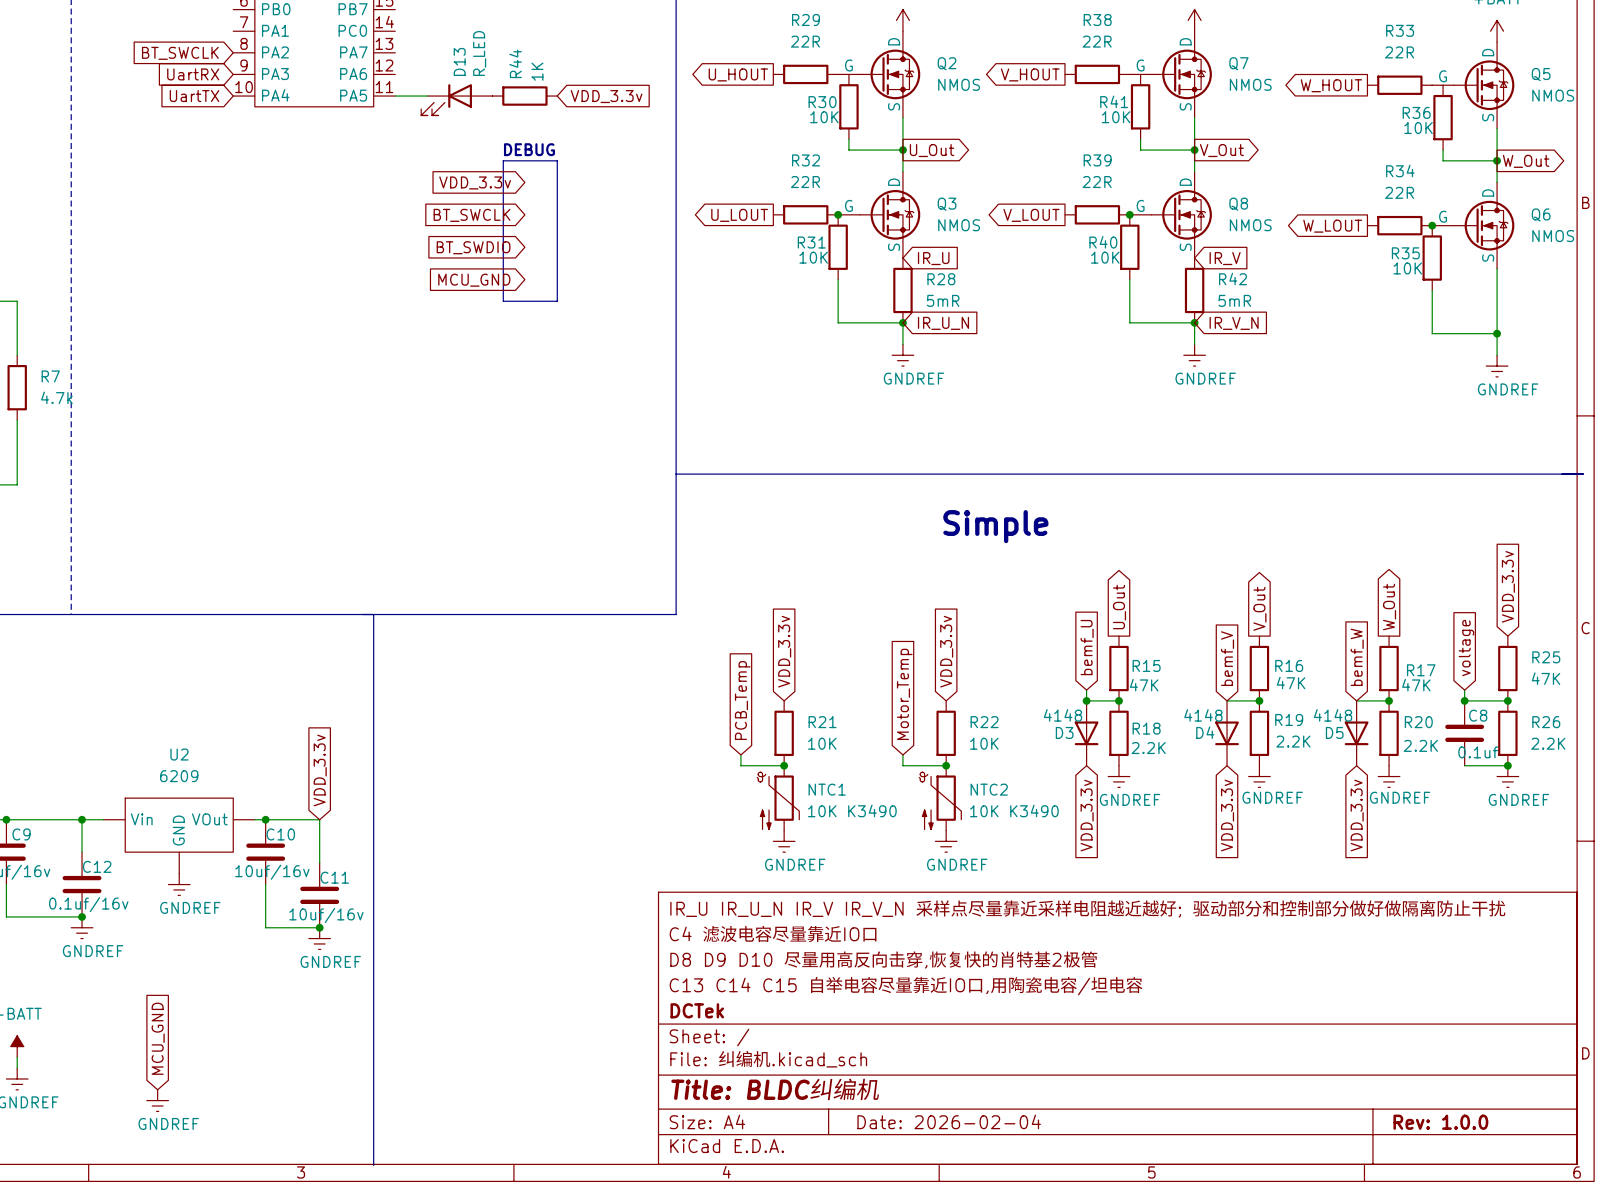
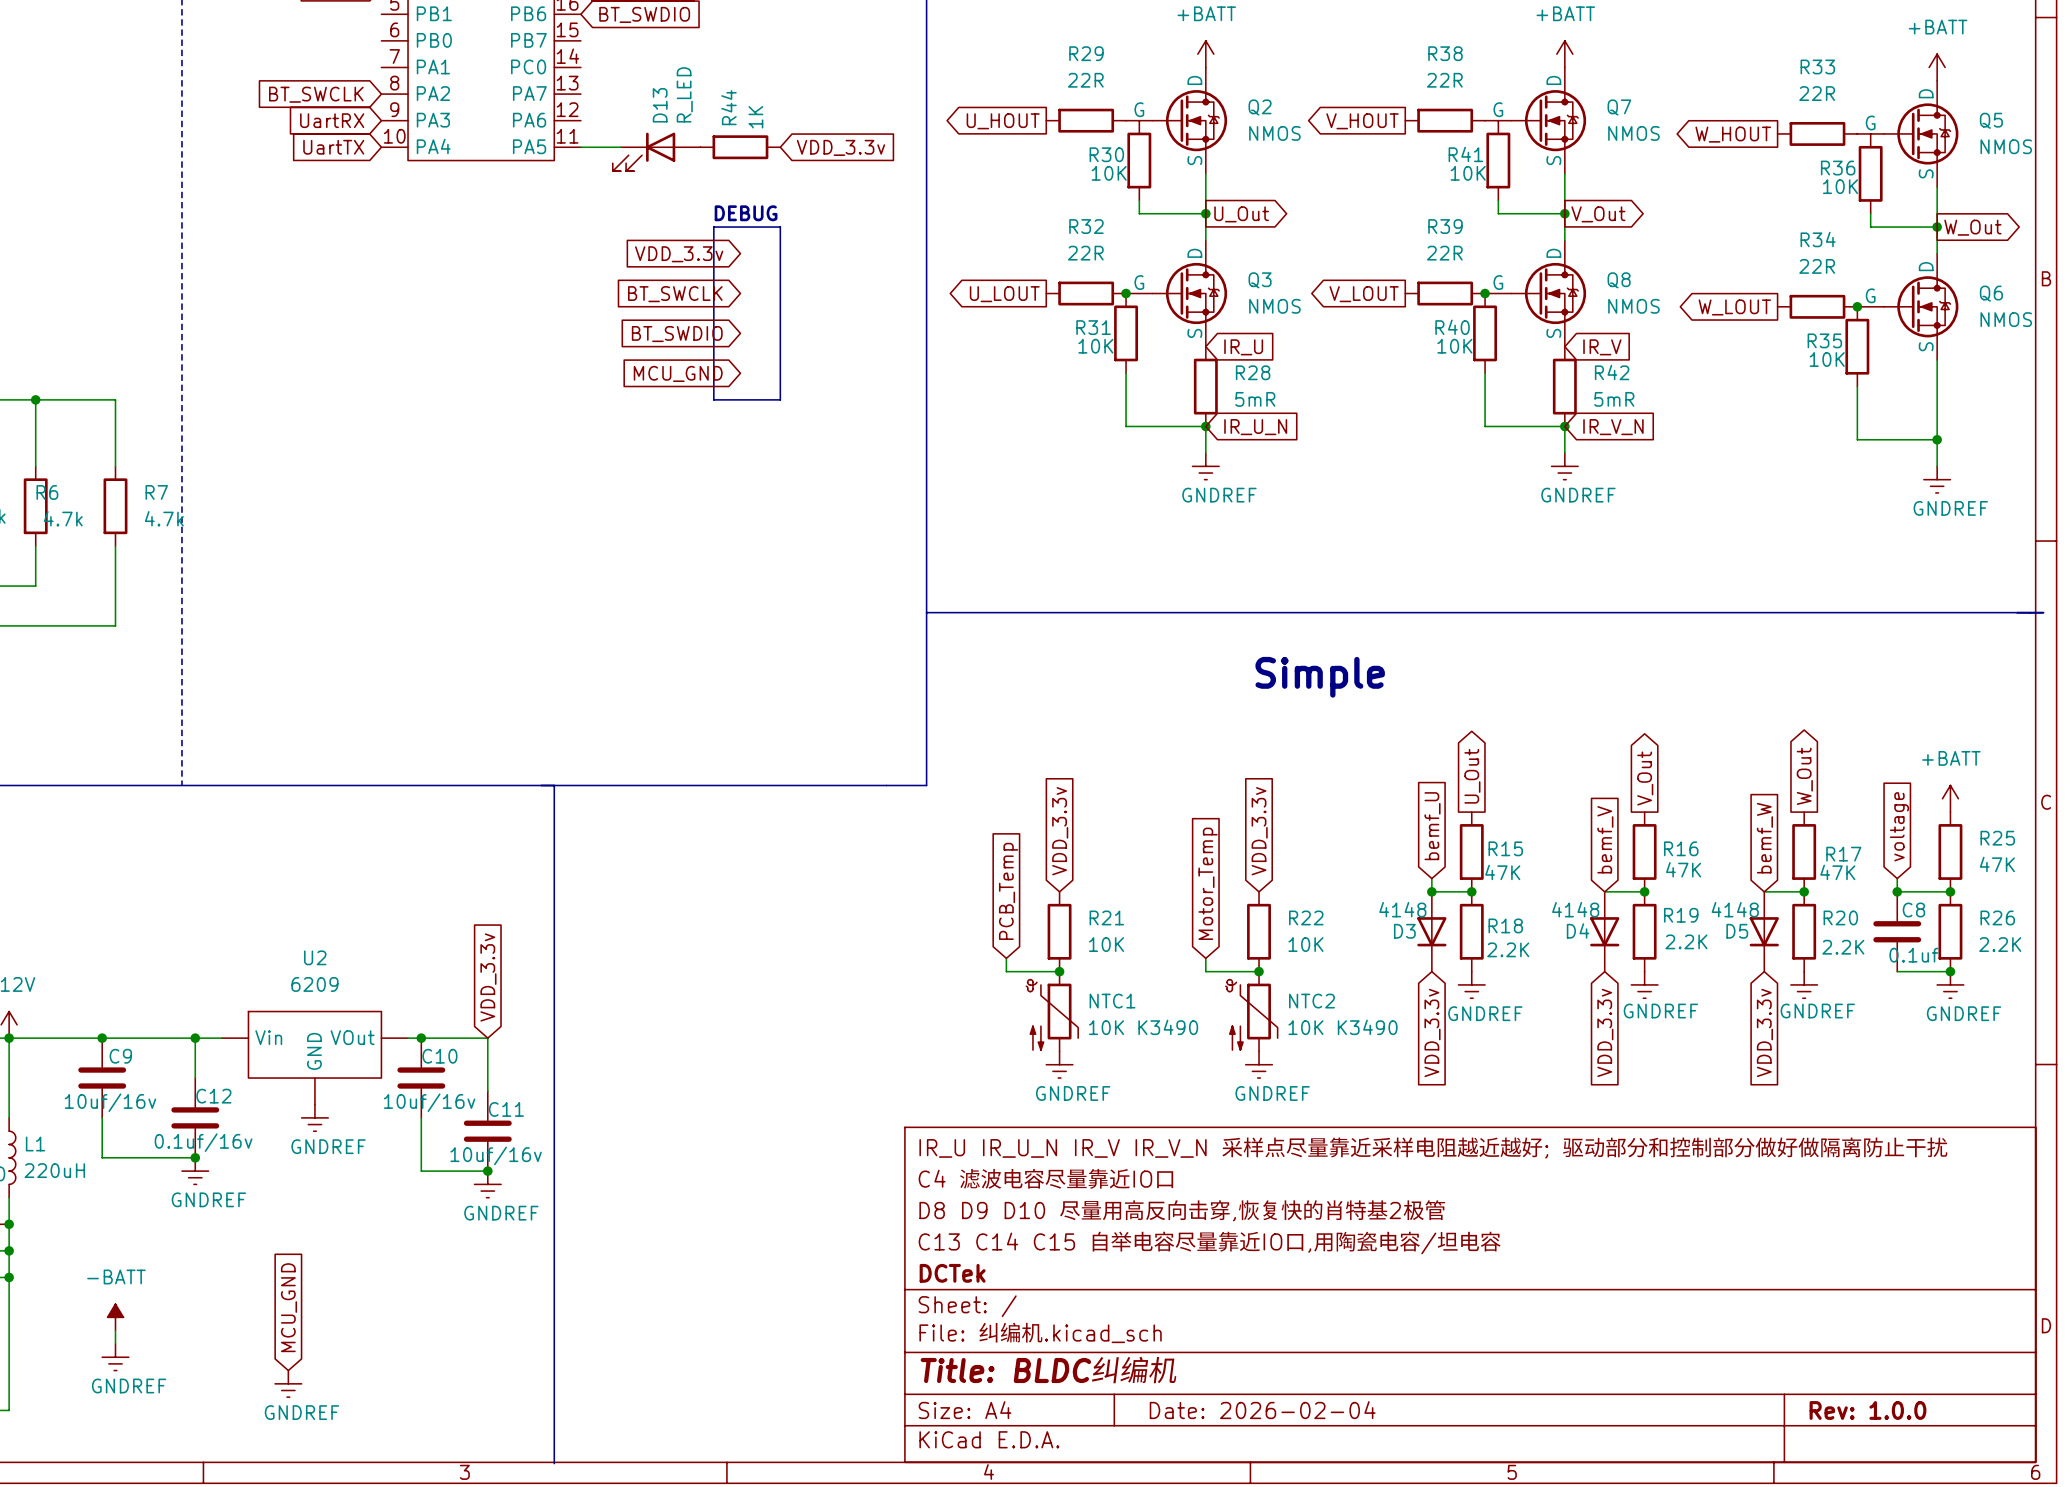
global label: VDD_3.3v (1508, 586) -> none
power symbol: none -> +BATT (1950, 798)

